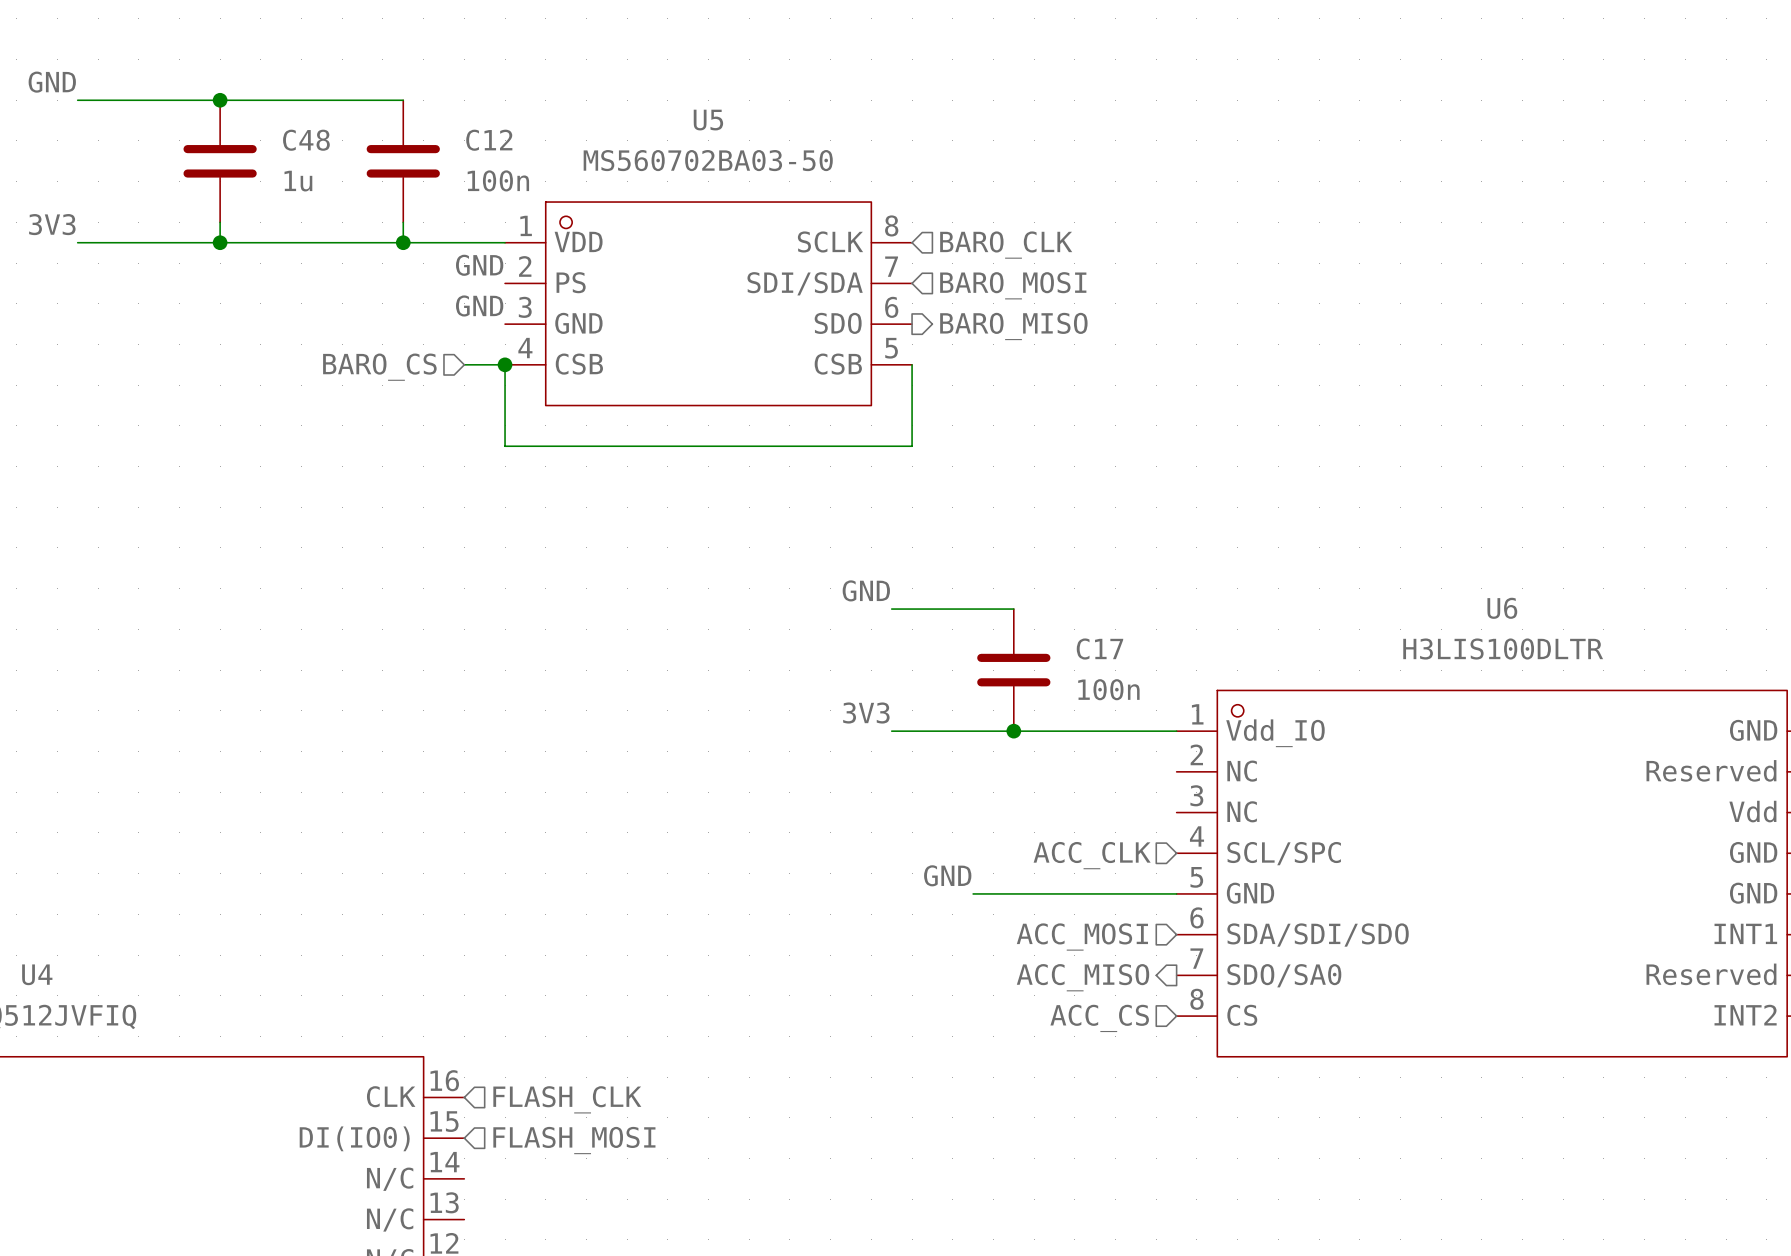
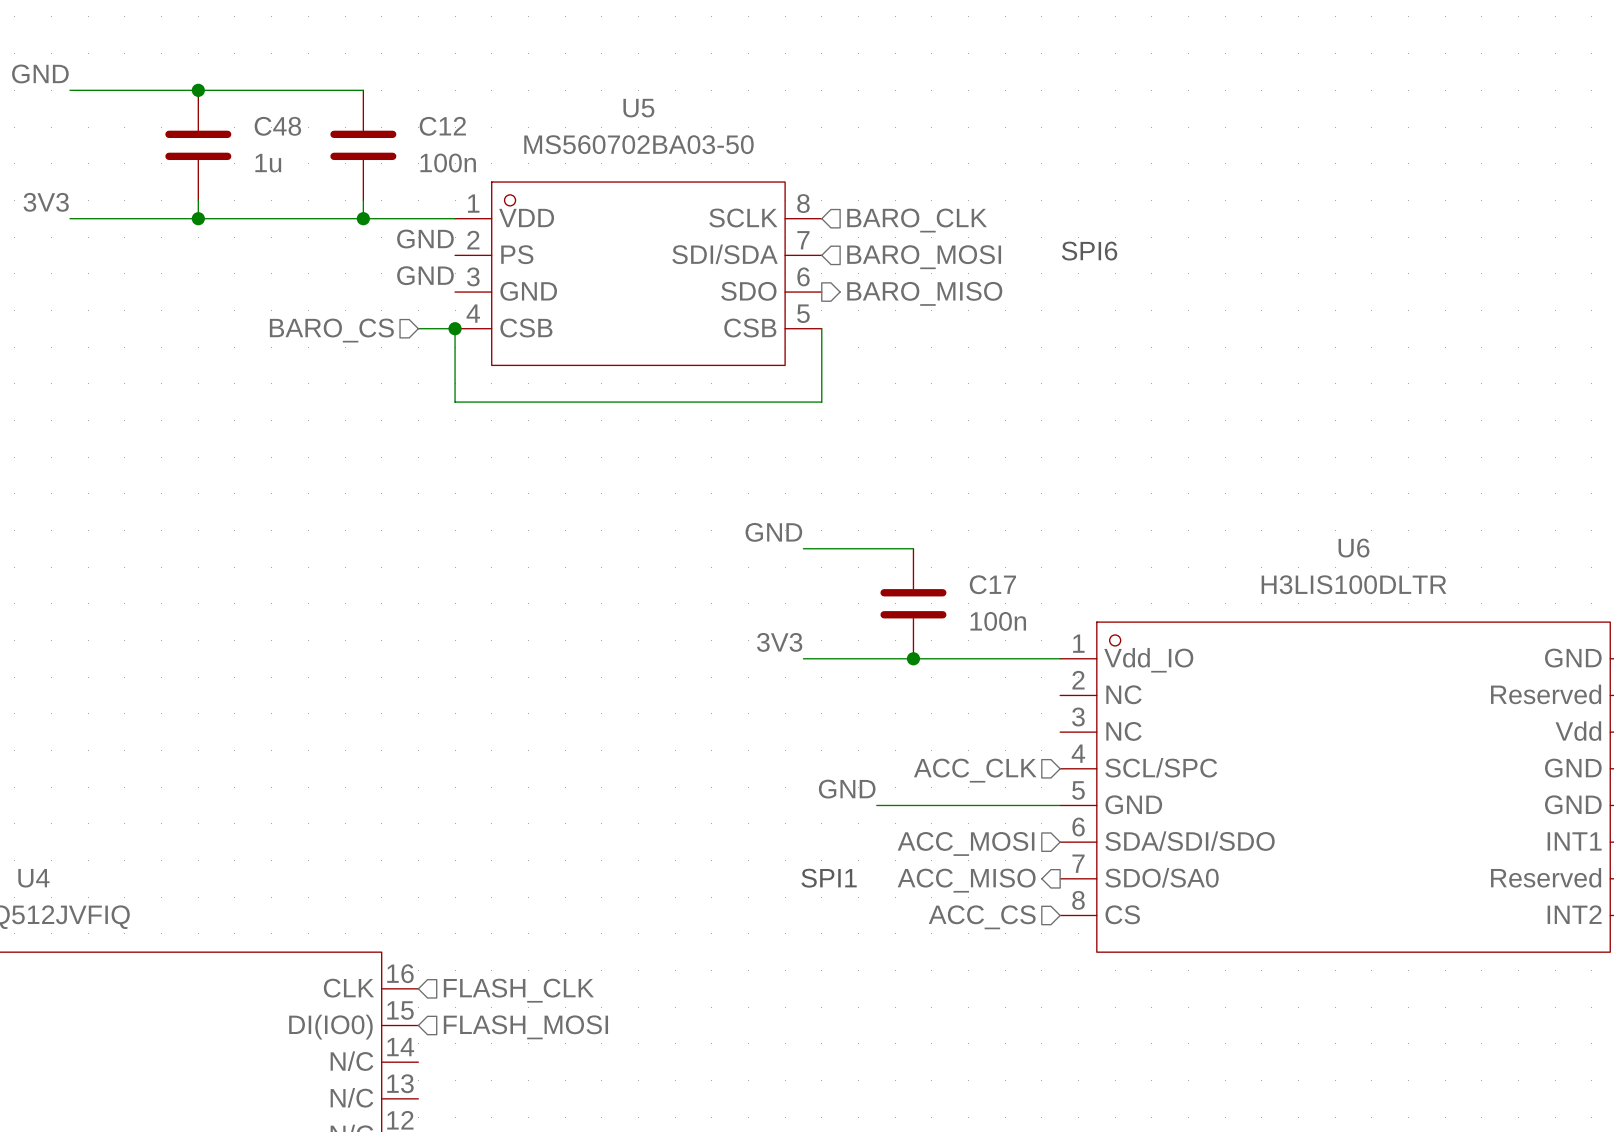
text: none -> SPI6 (1089, 251)
text: none -> SPI1 (829, 878)

